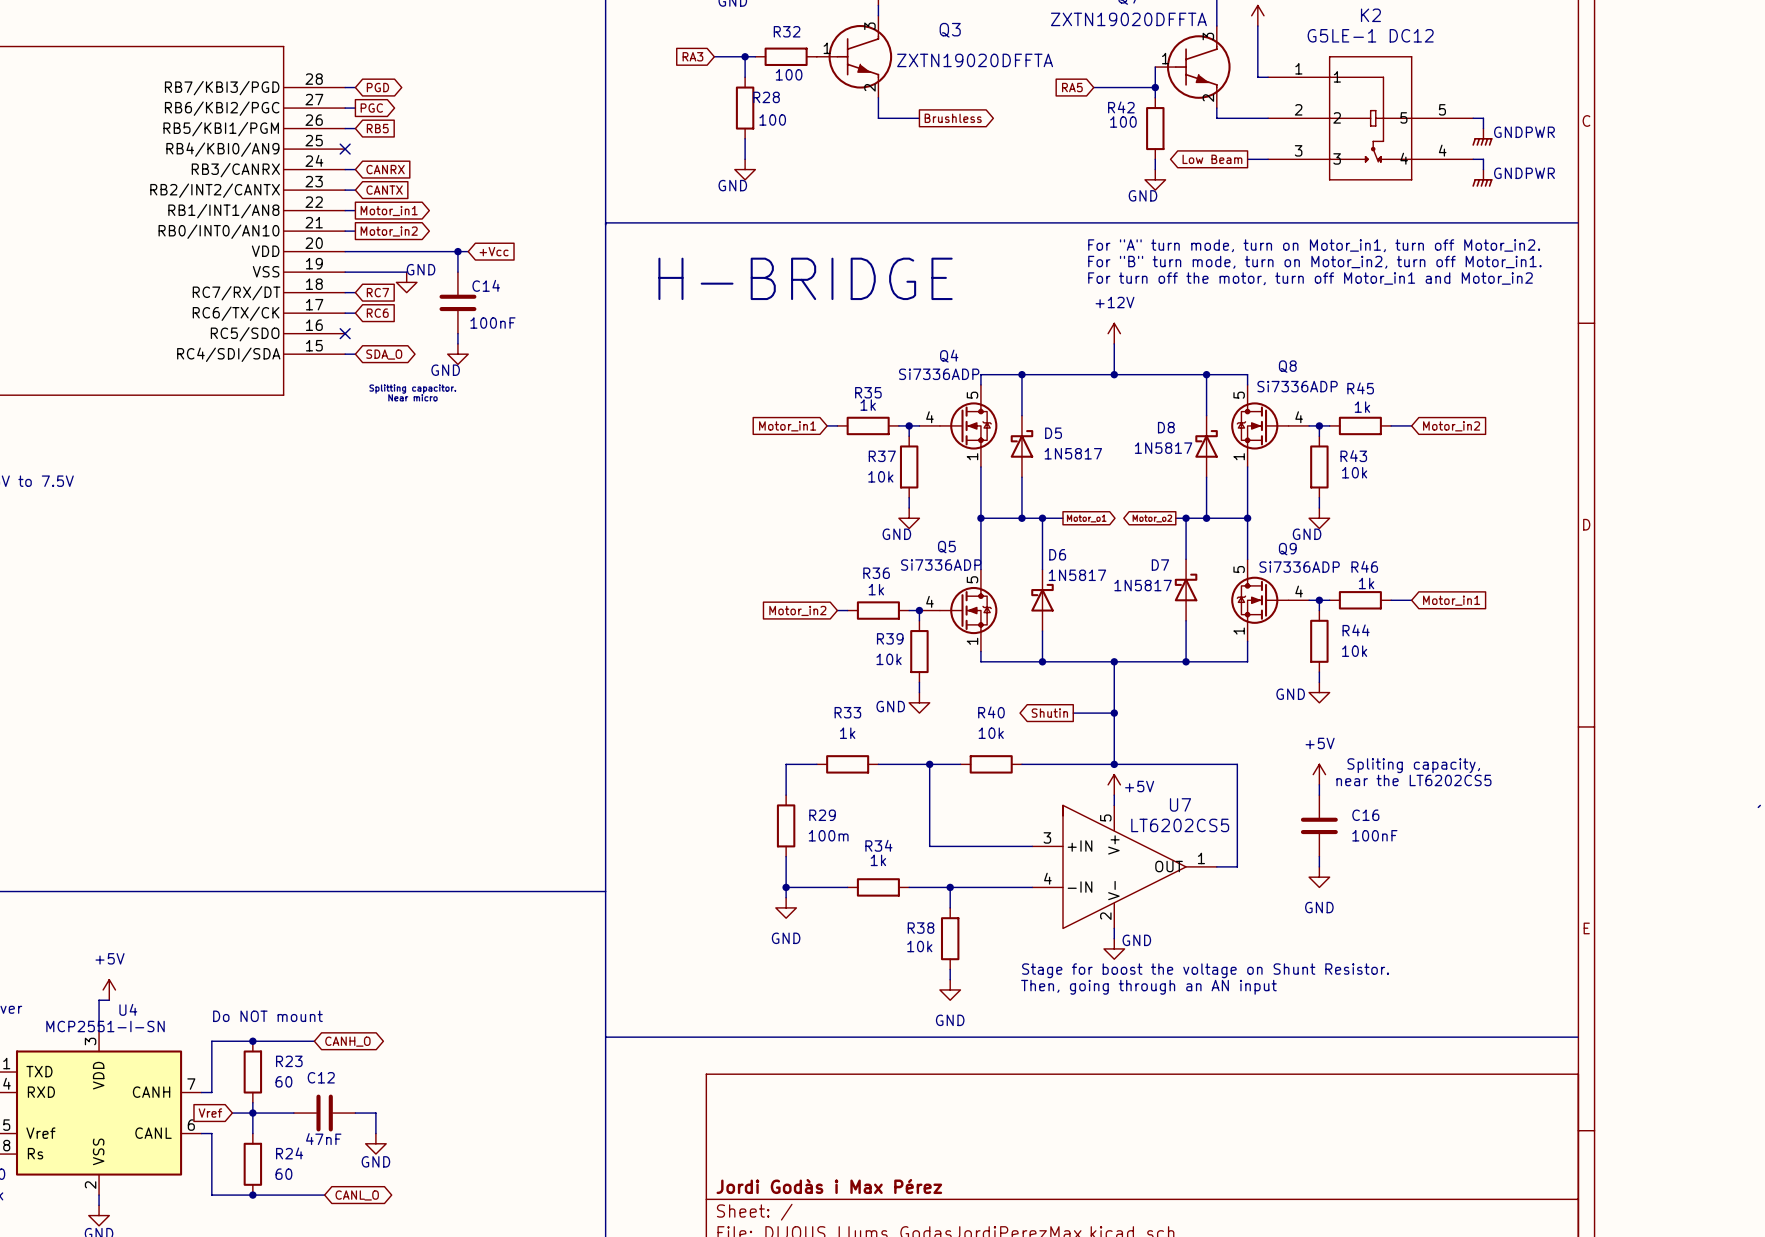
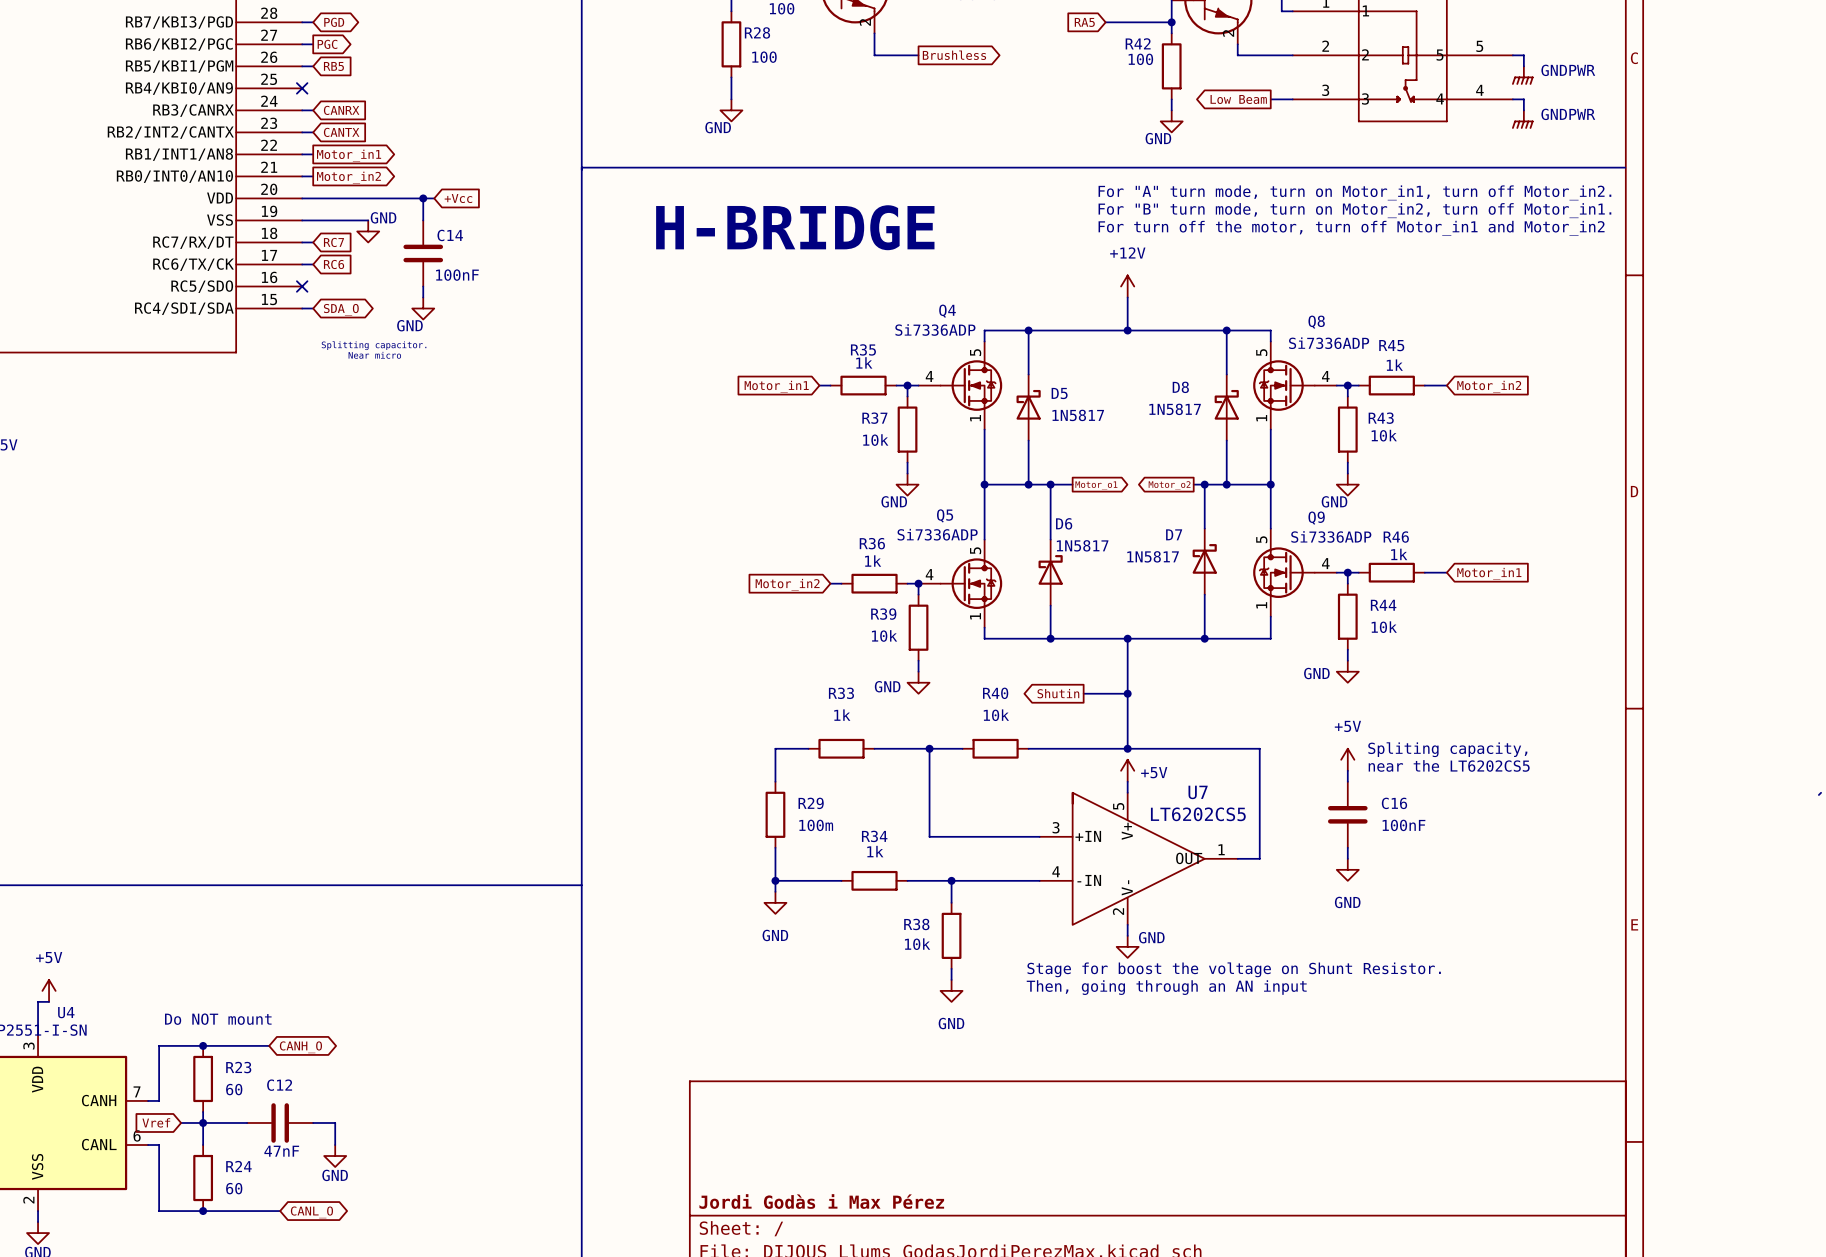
line: (605, 1037) (1577, 1037) -> none

